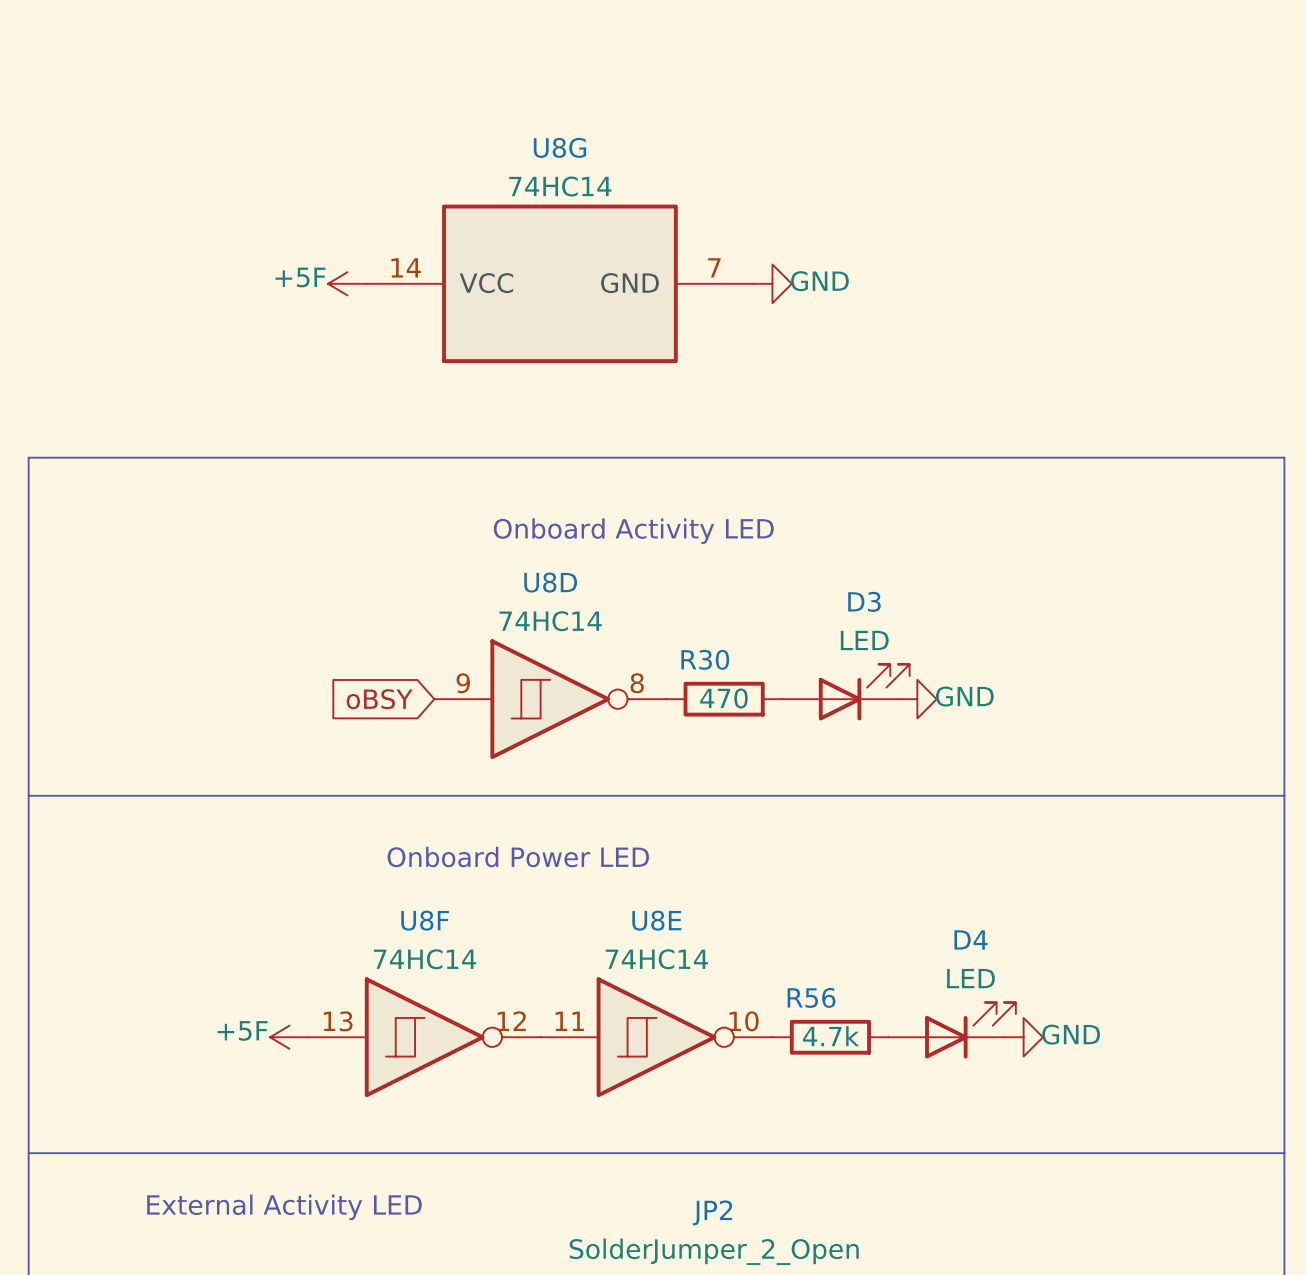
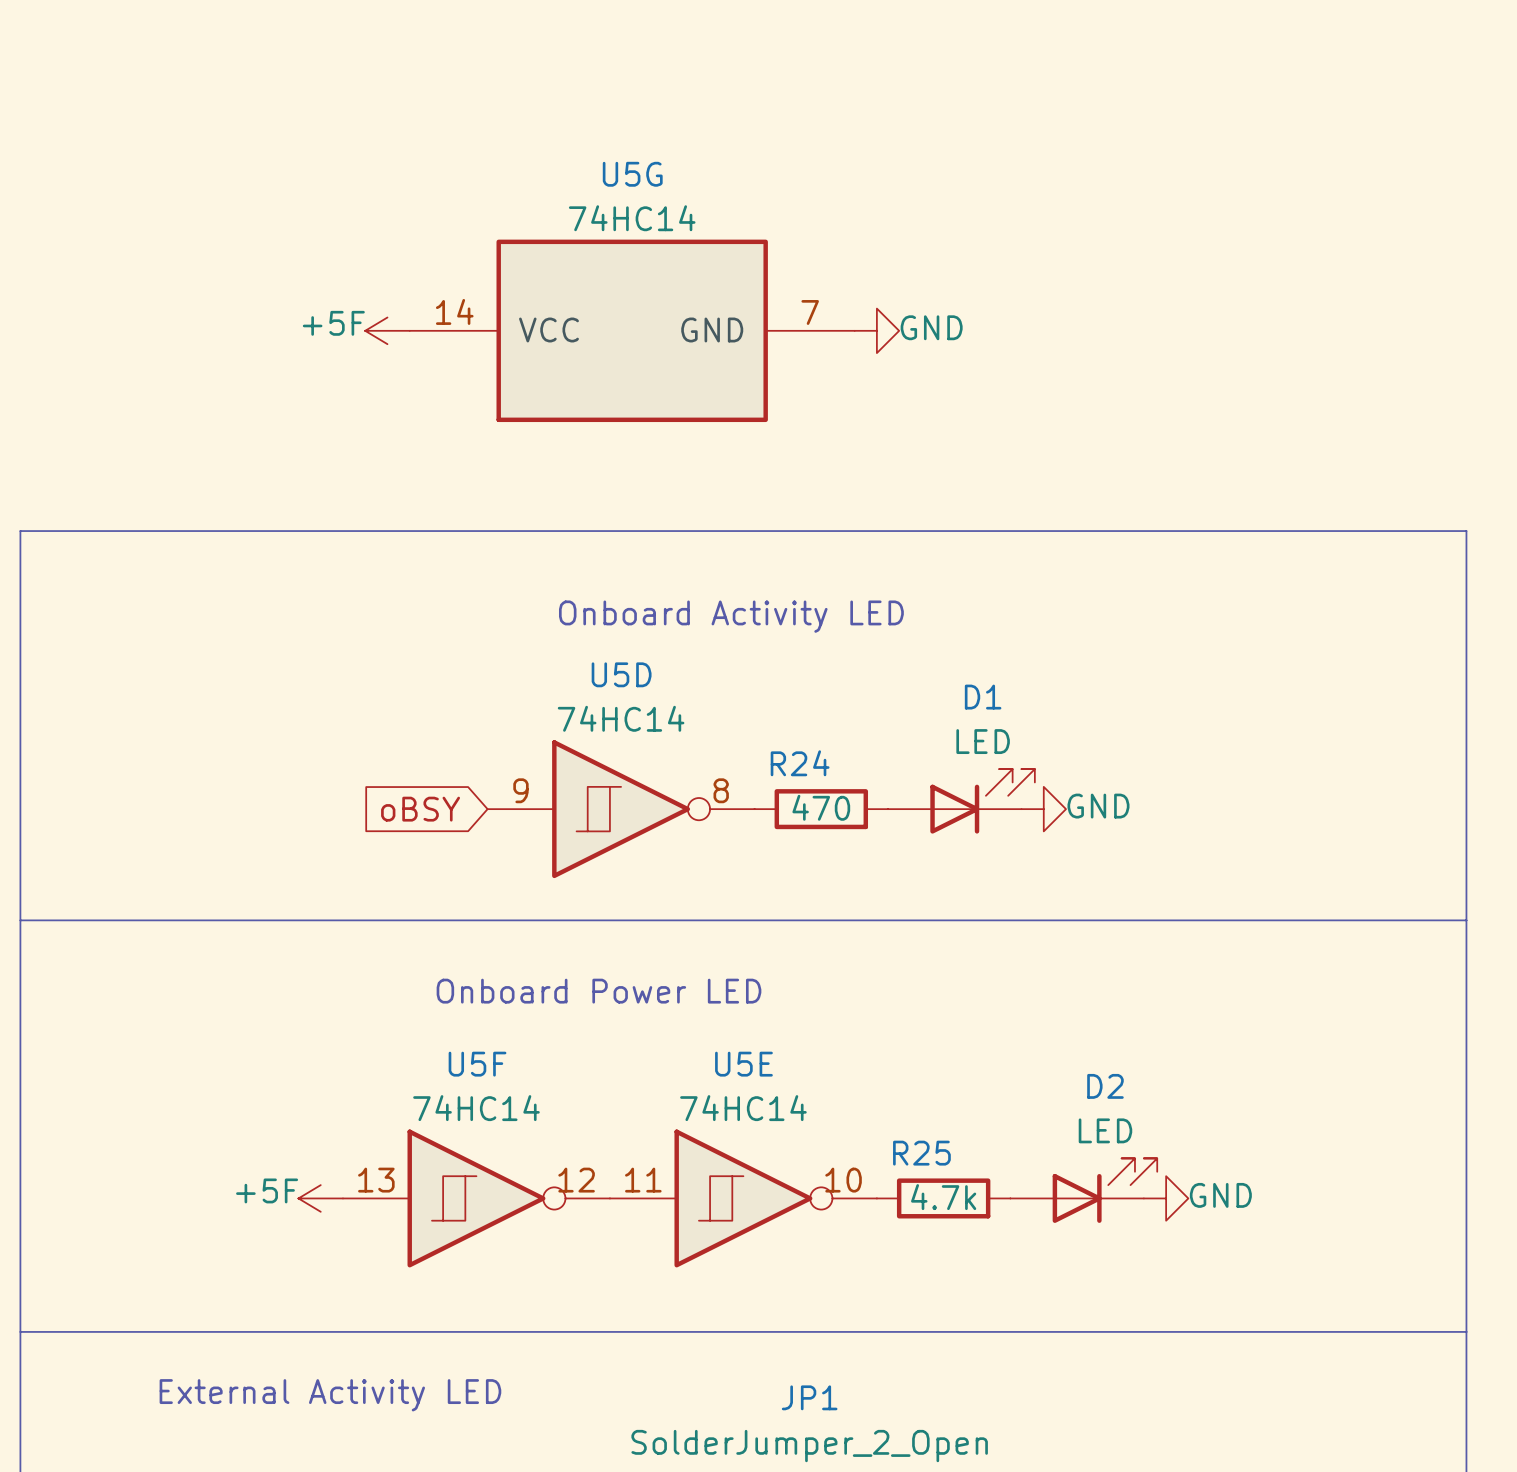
U8G name: U8G (559, 147) -> U5G (632, 174)
U8D name: U8D (550, 582) -> U5D (621, 674)
D3 name: D3 (864, 601) -> D1 (983, 697)
R30 name: R30 (705, 659) -> R24 (800, 763)
U8F name: U8F (425, 920) -> U5F (477, 1064)
U8E name: U8E (656, 920) -> U5E (743, 1064)
D4 name: D4 (971, 939) -> D2 (1105, 1086)
R56 name: R56 (811, 997) -> R25 (921, 1153)
JP2 name: JP2 (712, 1212) -> JP1 (809, 1397)

